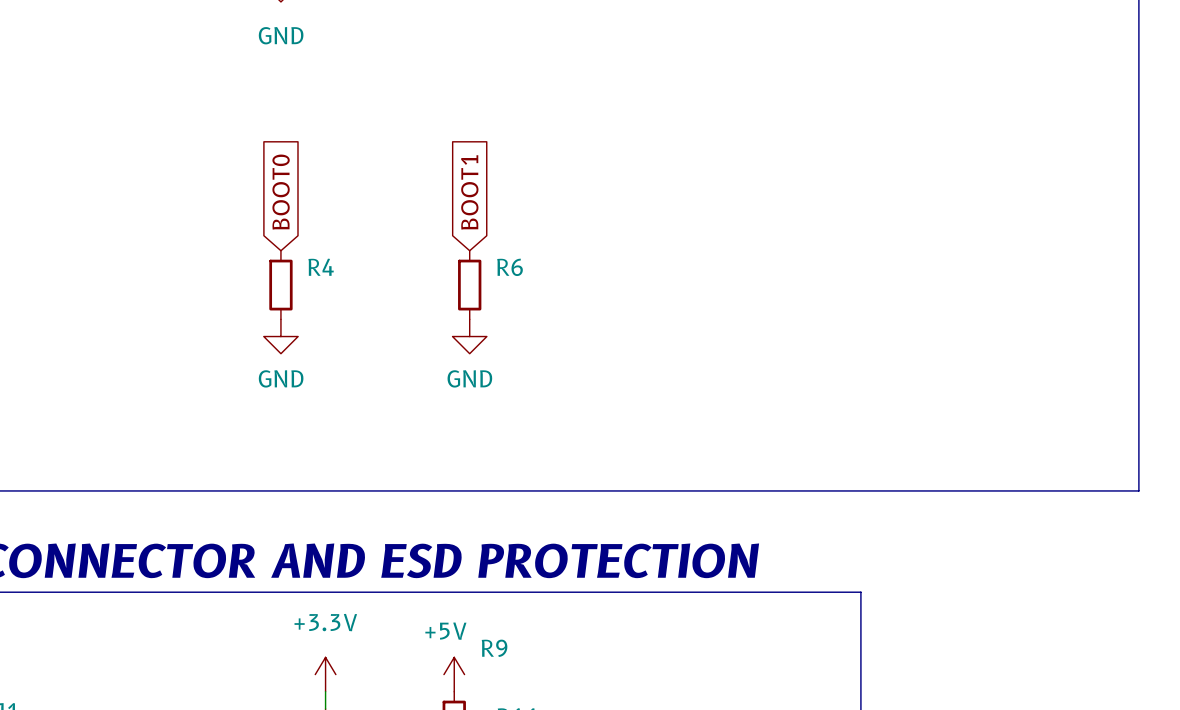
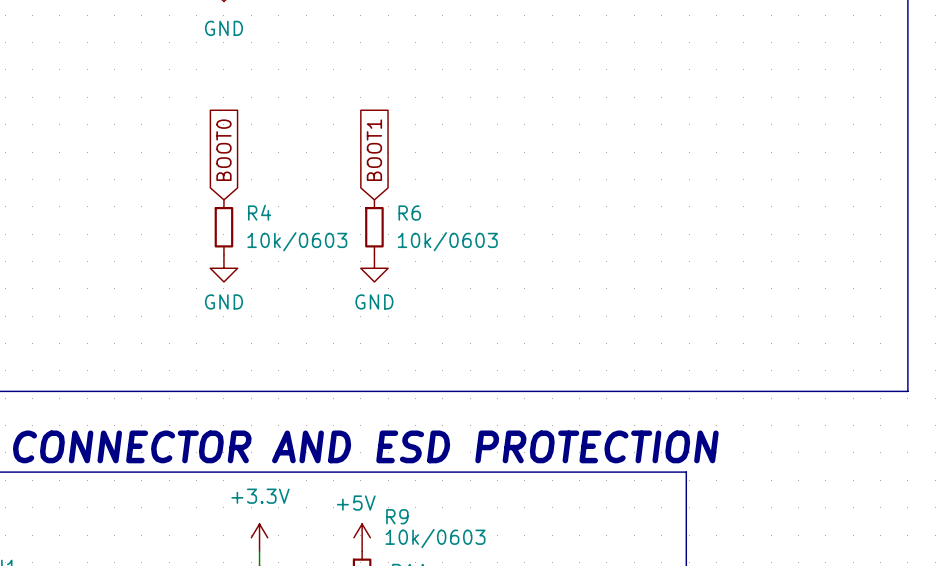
R4 value: none -> 10k/0603 (297, 241)
R6 value: none -> 10k/0603 (447, 241)
R9 value: none -> 10k/0603 (435, 538)

